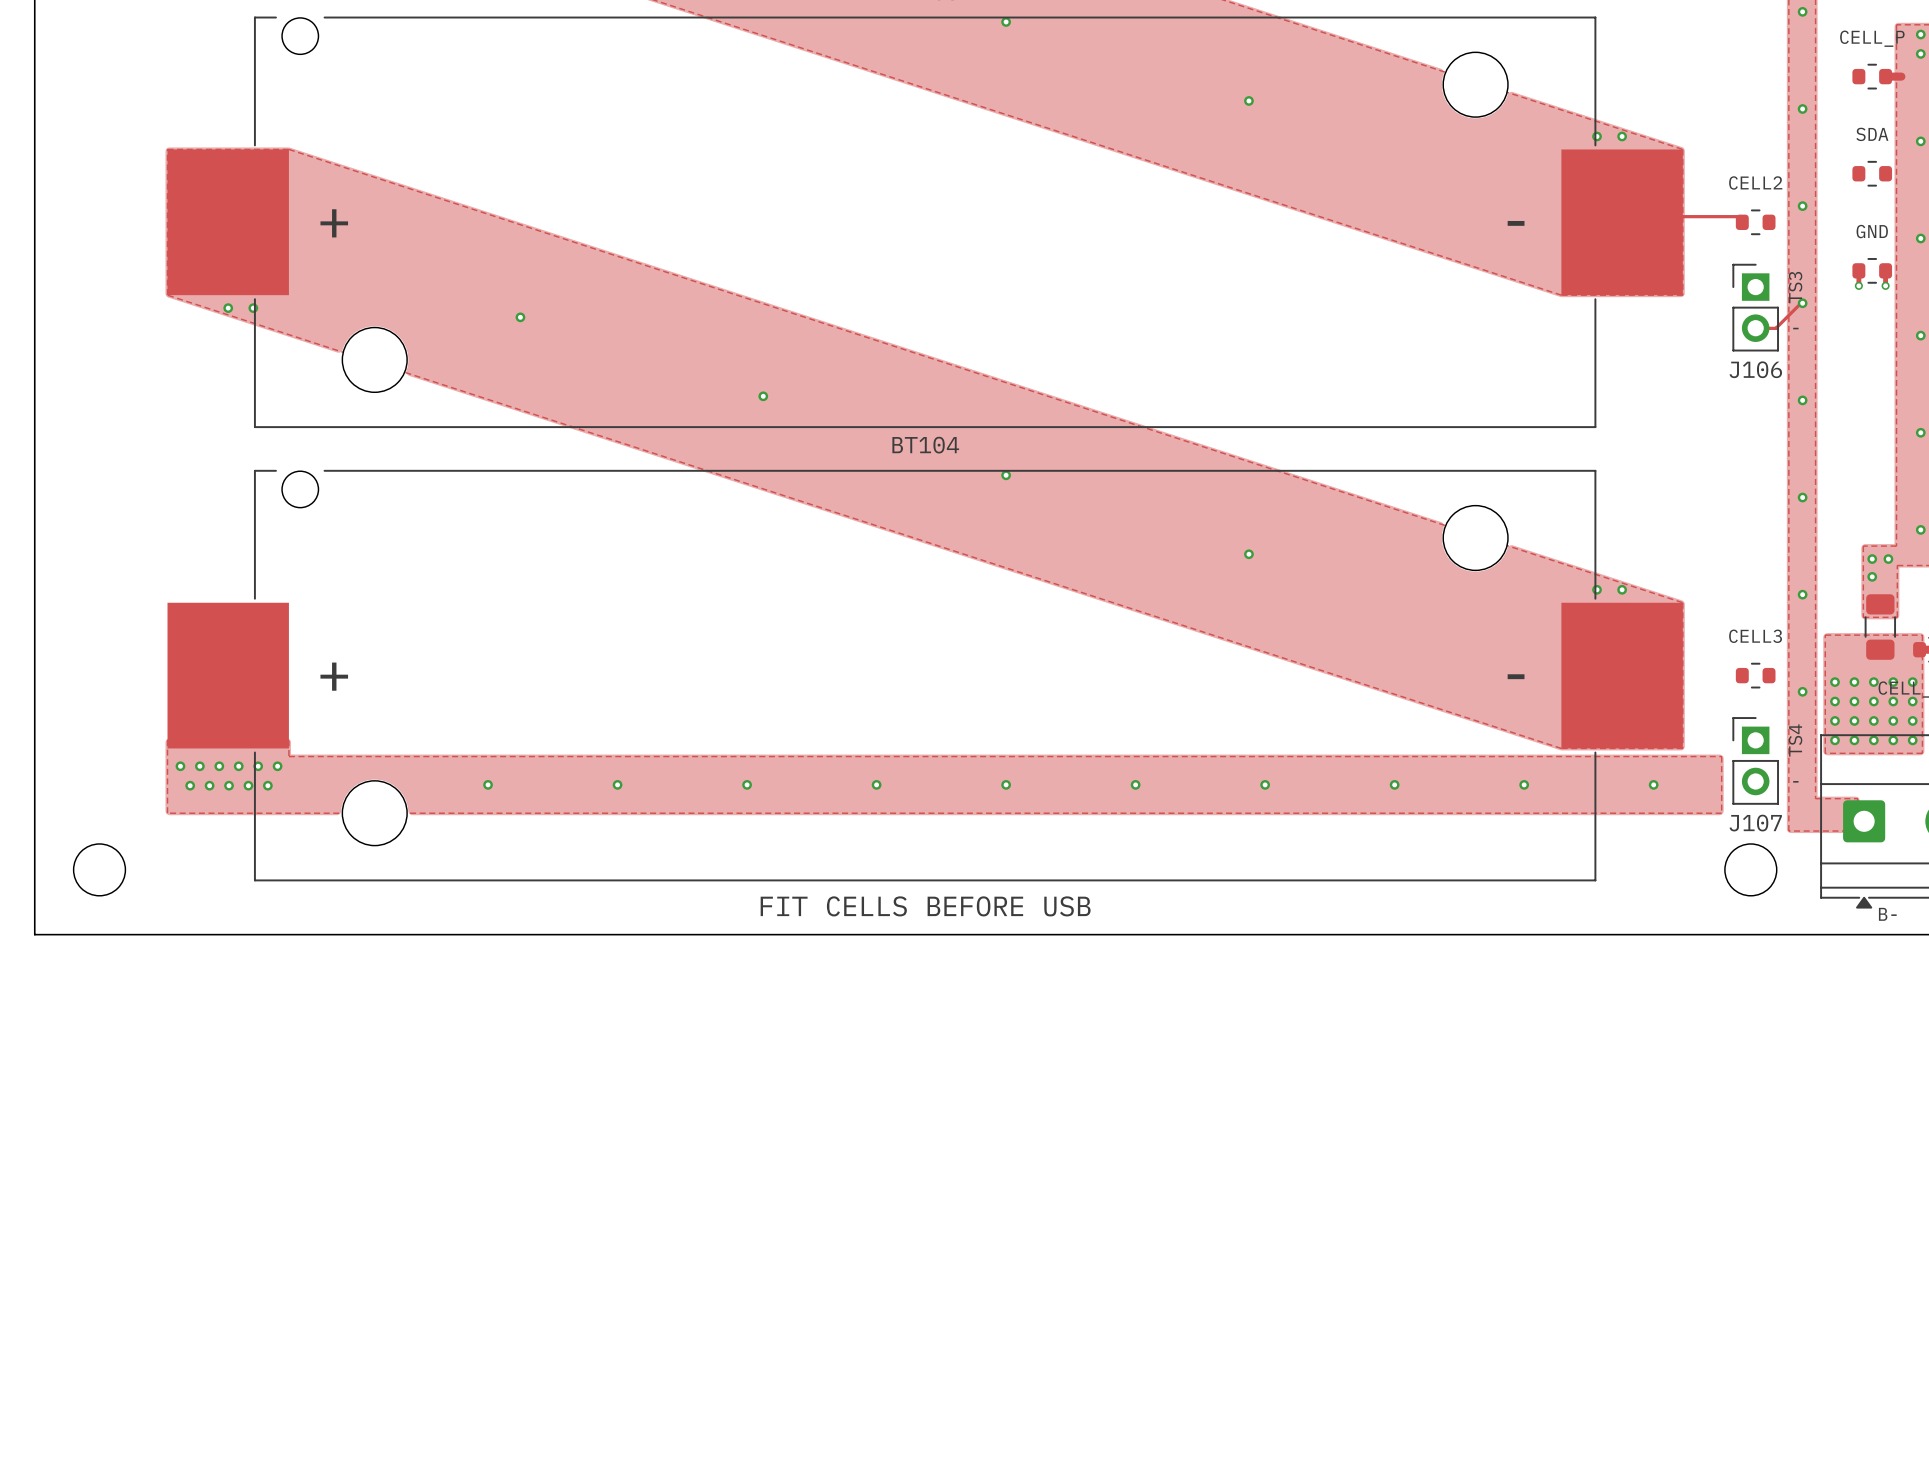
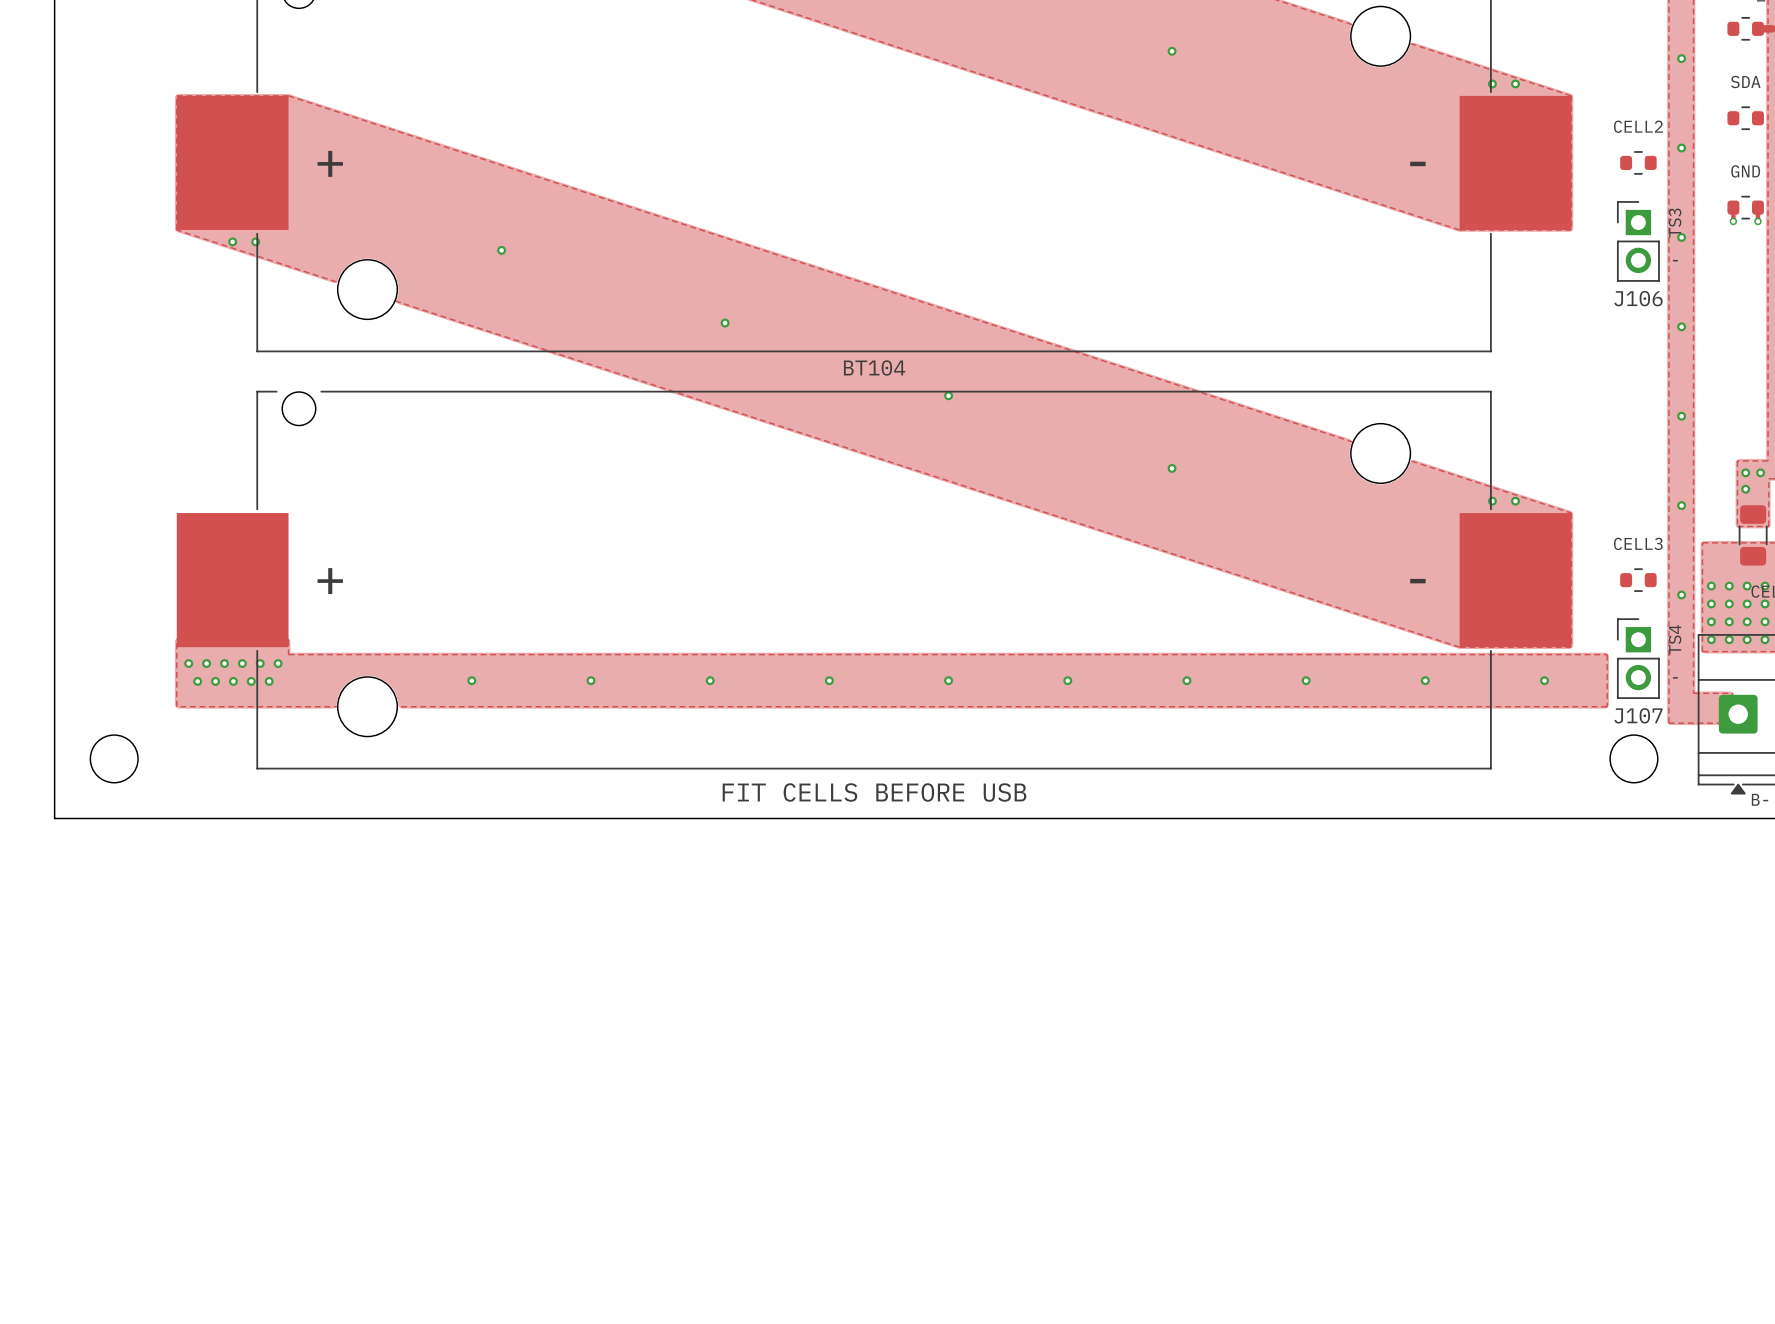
track: (1682, 216) (1737, 216) -> none
track: (1798, 305) (1775, 328) (1767, 328) -> none

